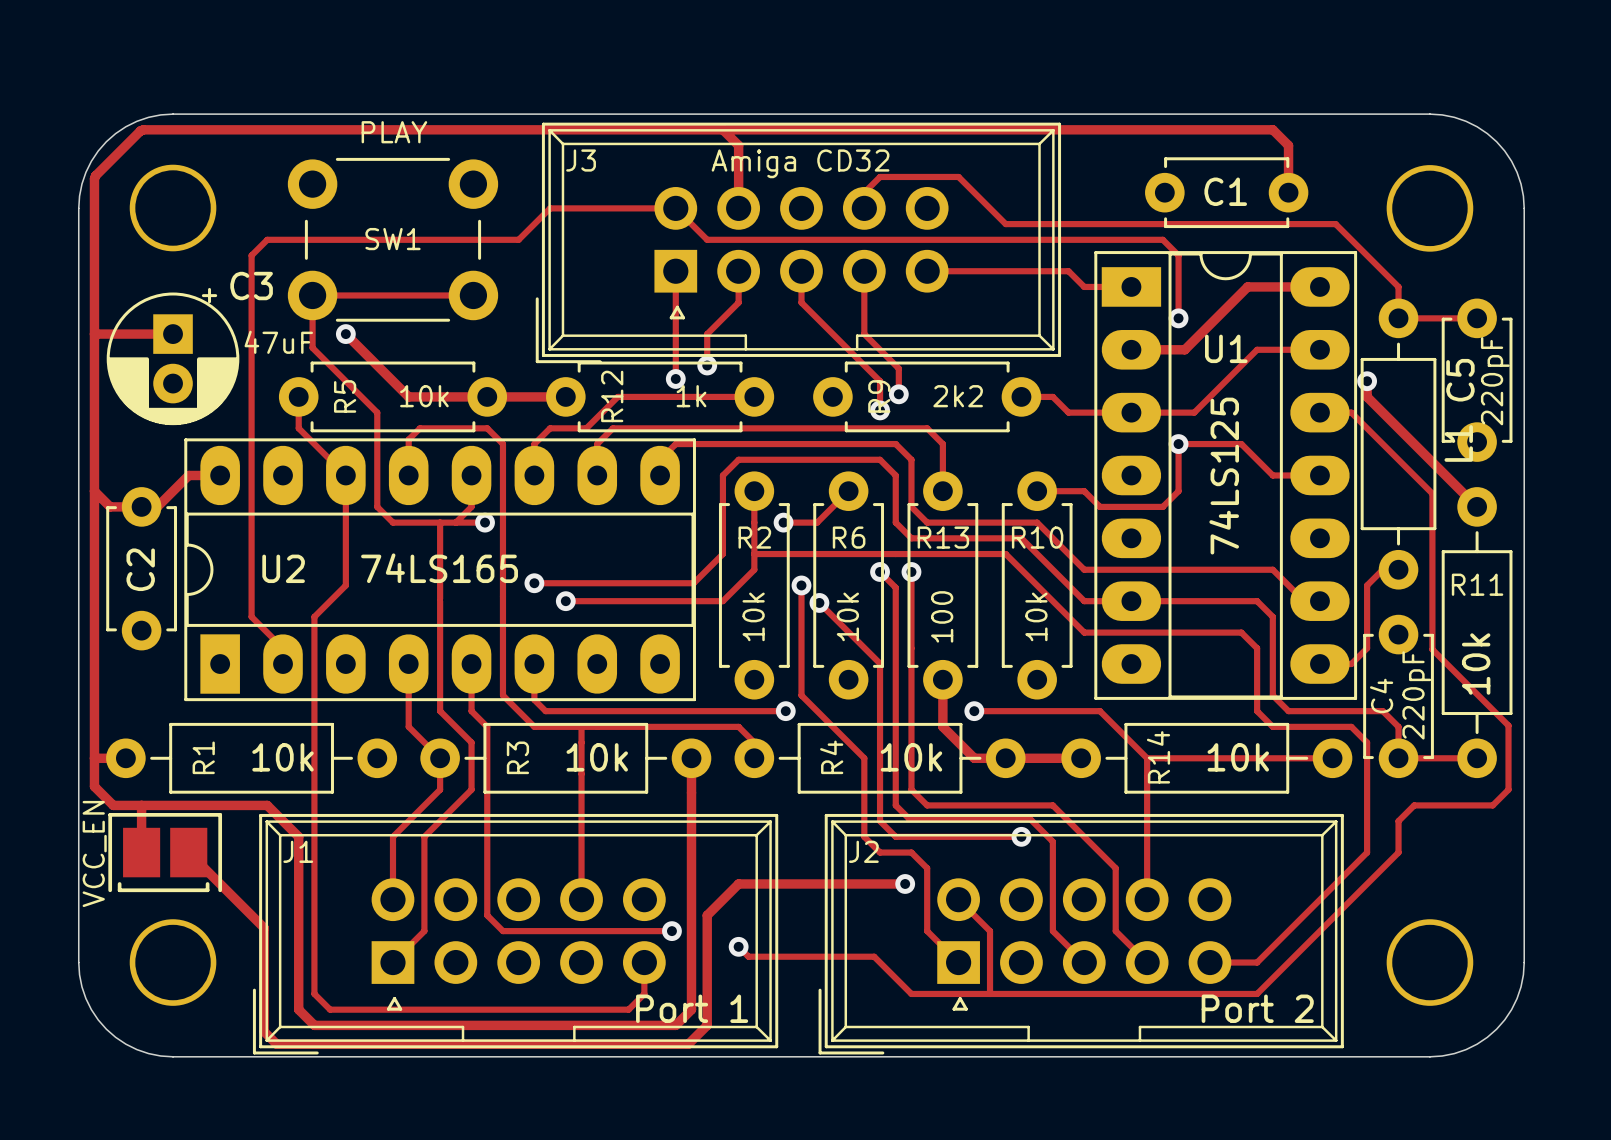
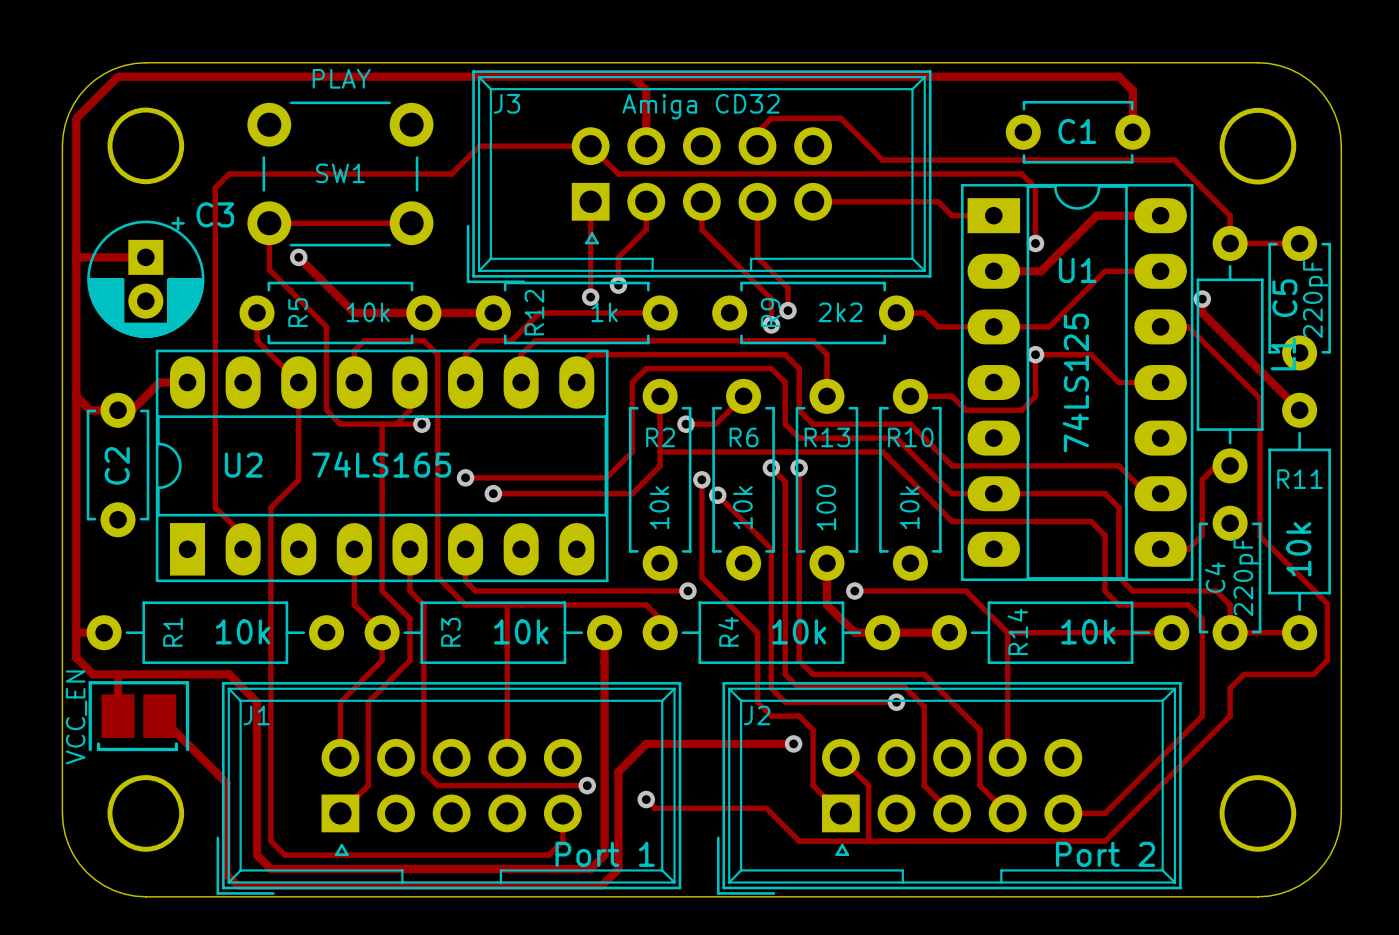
C3 value: 47uF (278, 342) -> none

